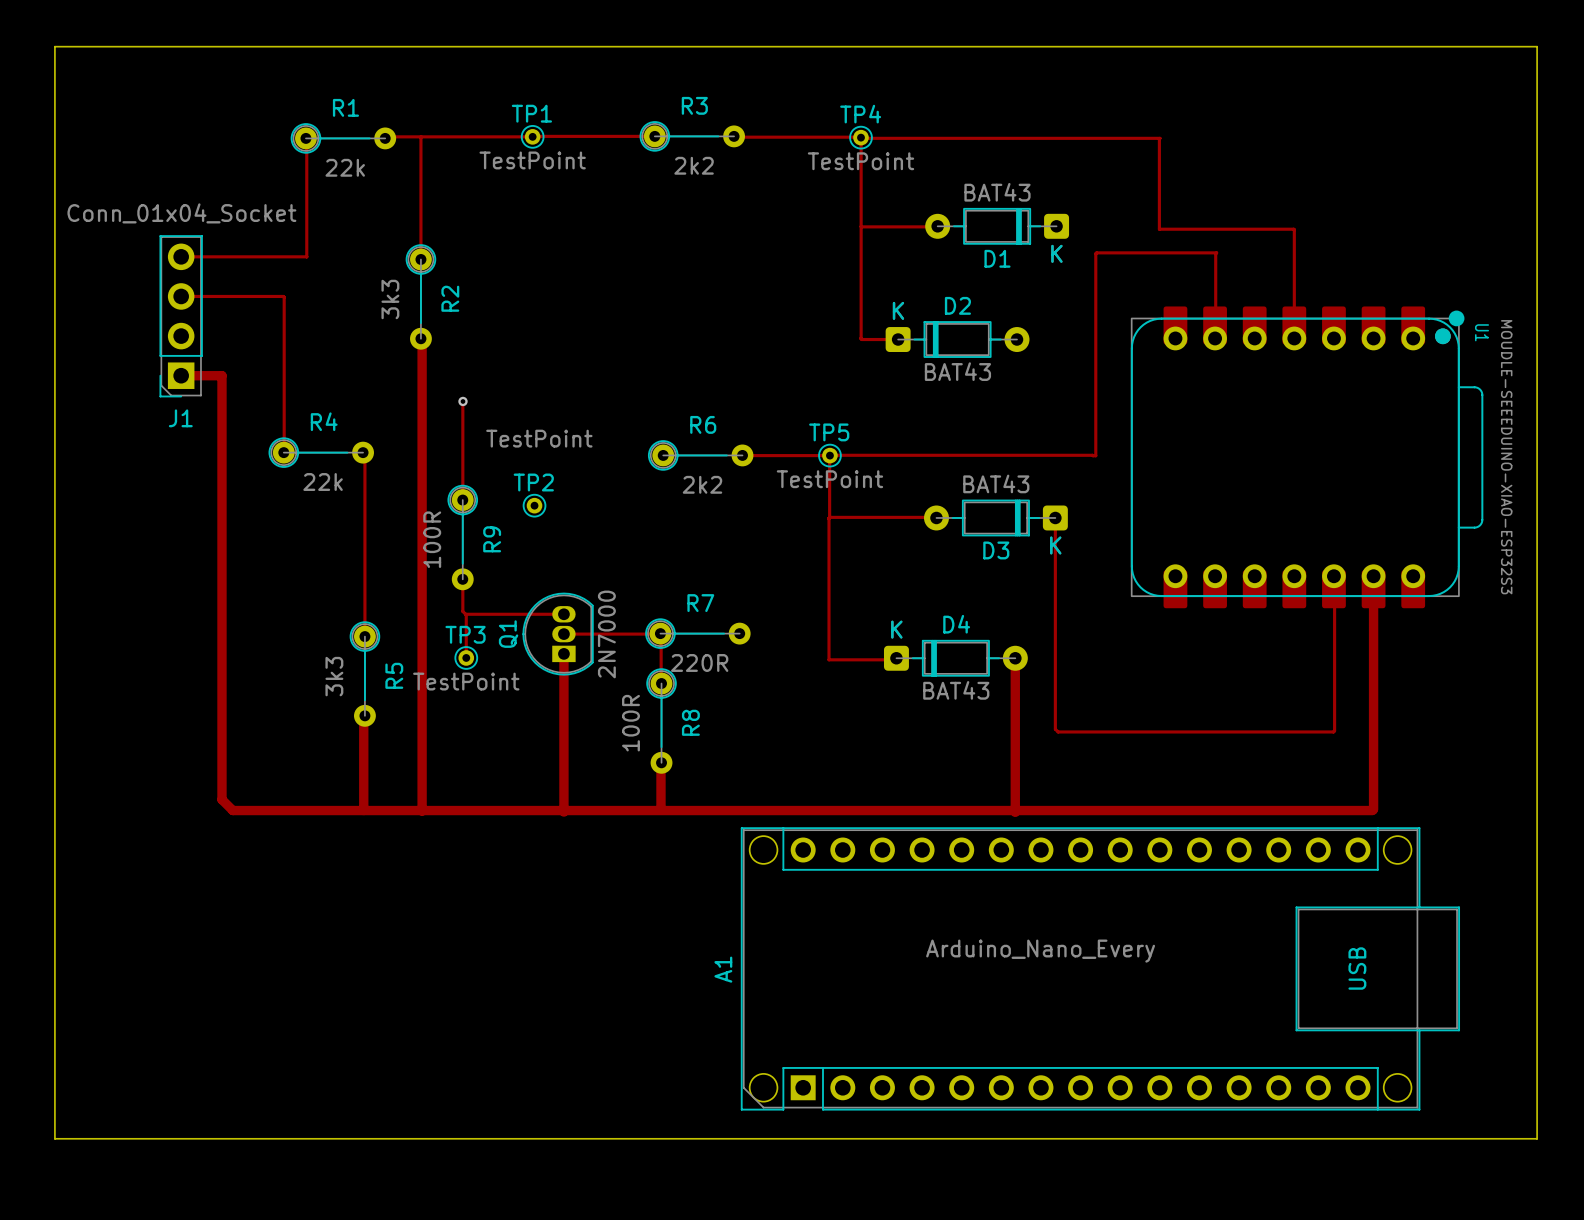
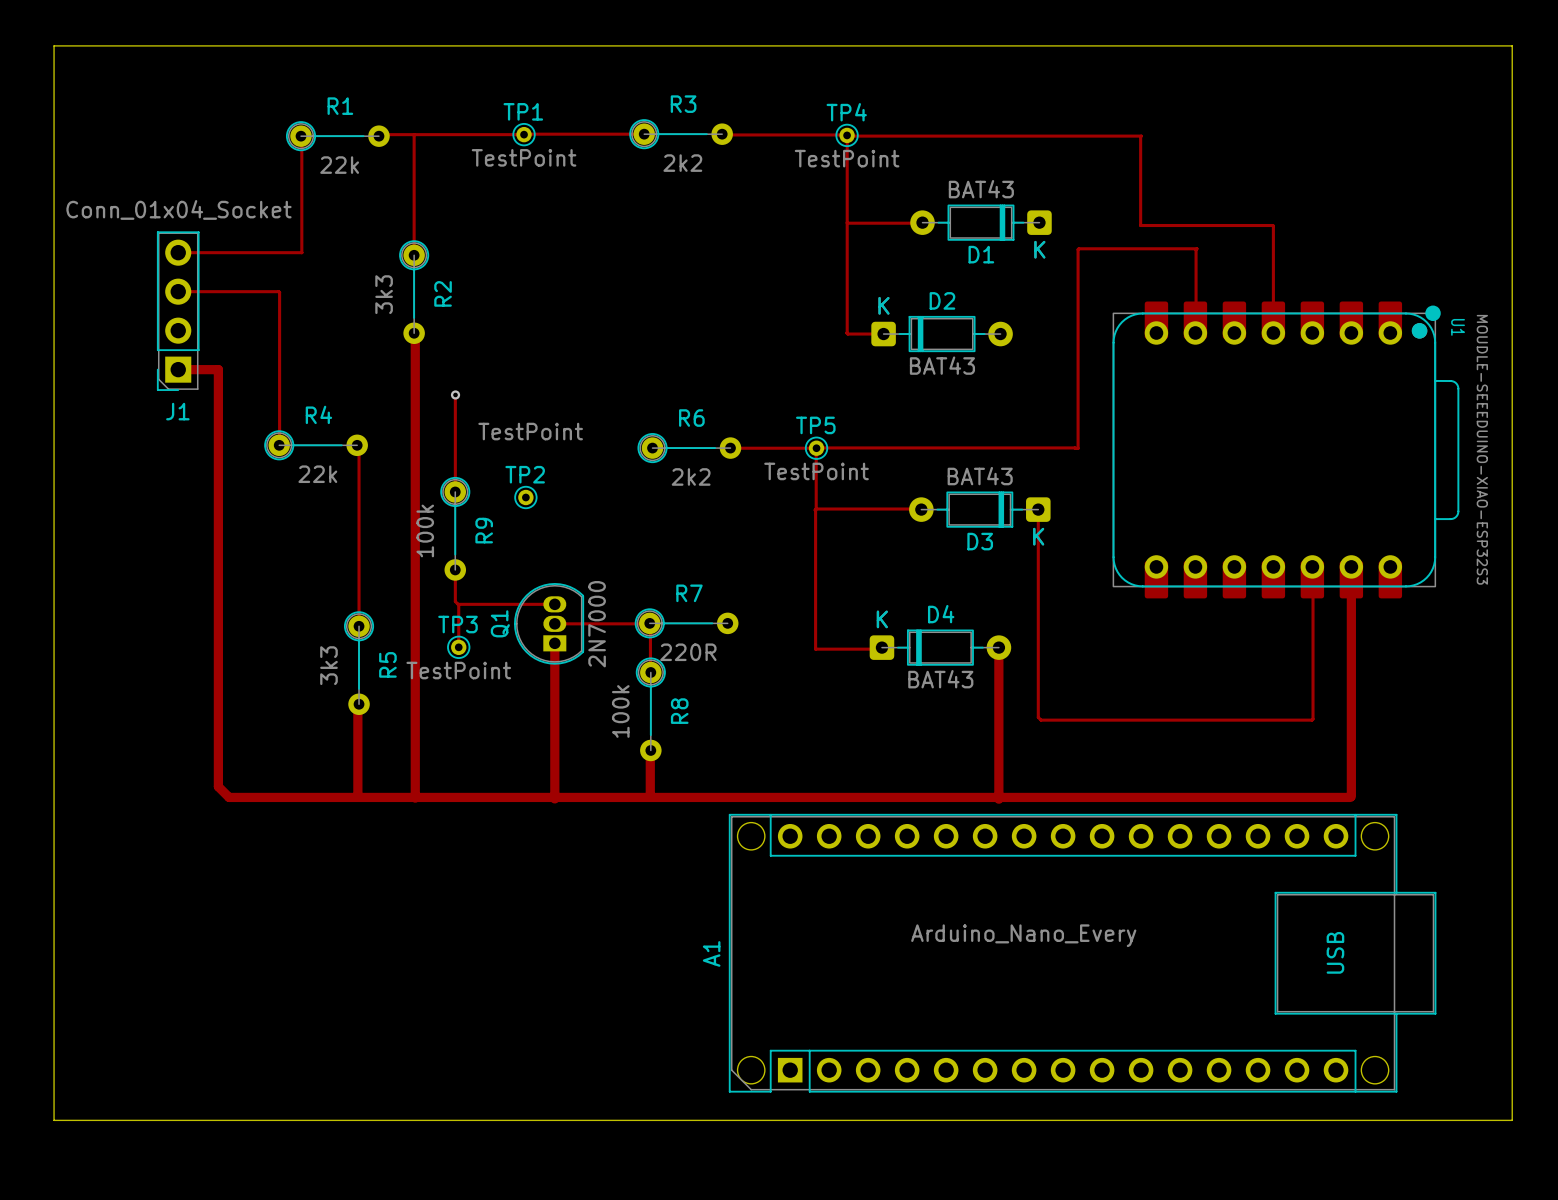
R9 value: 100R (432, 539) -> 100k (425, 530)
R8 value: 100R (630, 723) -> 100k (620, 711)

